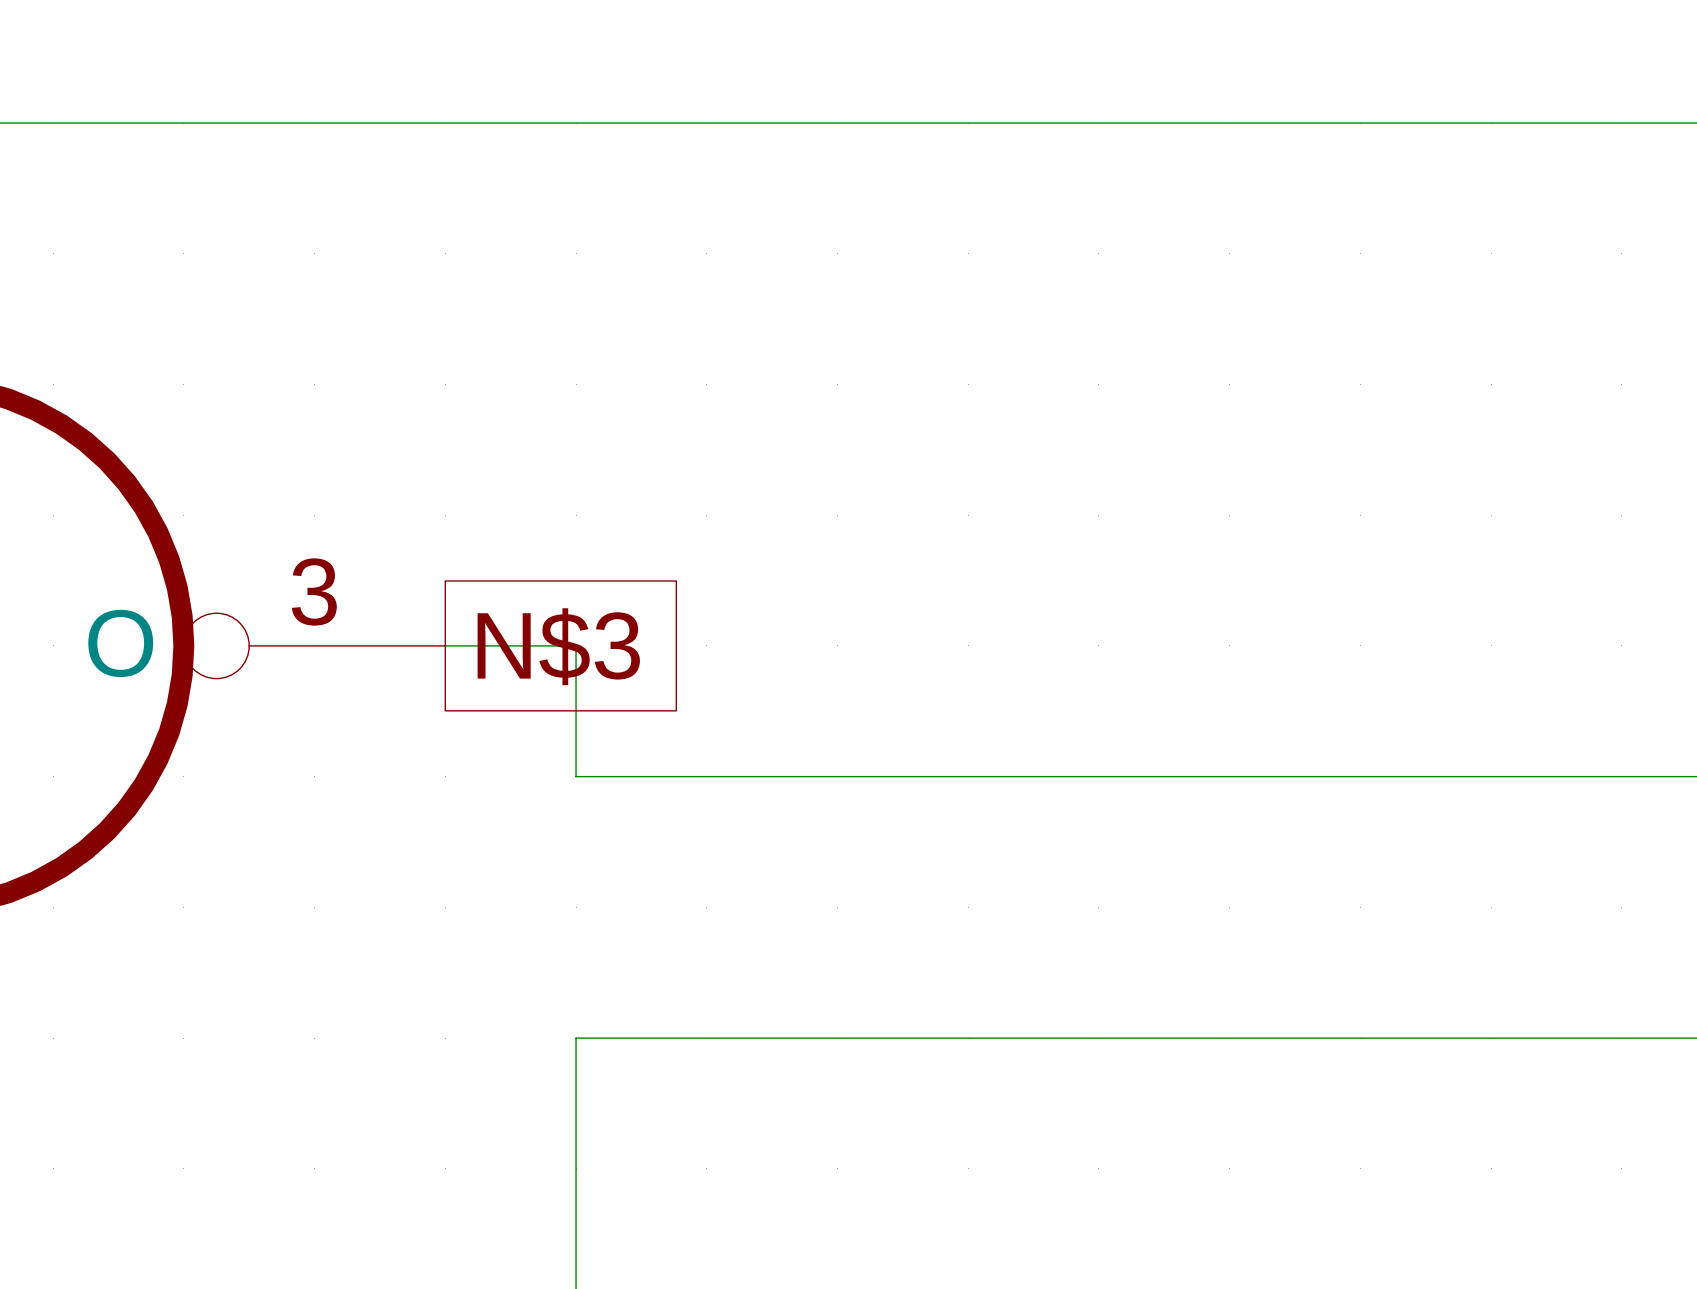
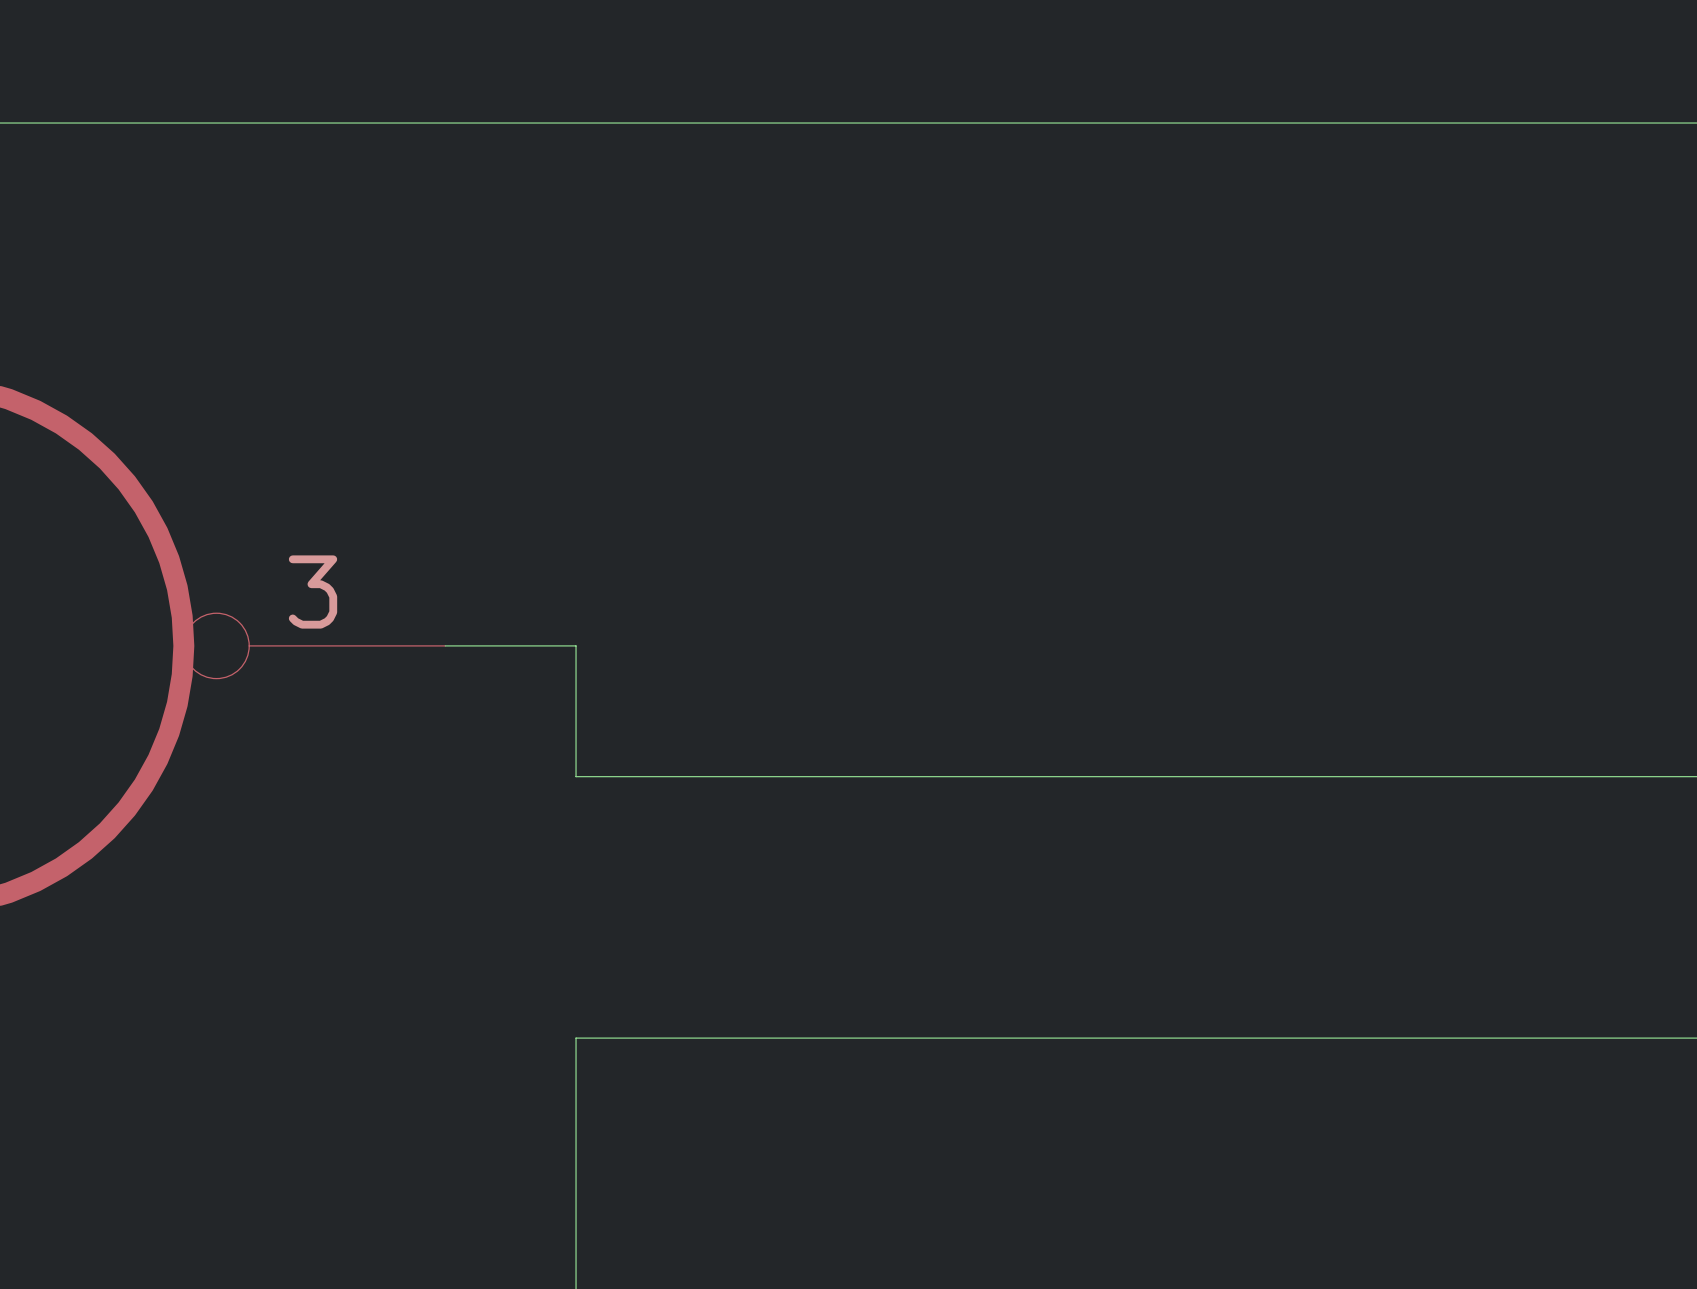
part pin name: O (120, 643) -> none
global label: N$3 (558, 646) -> none

